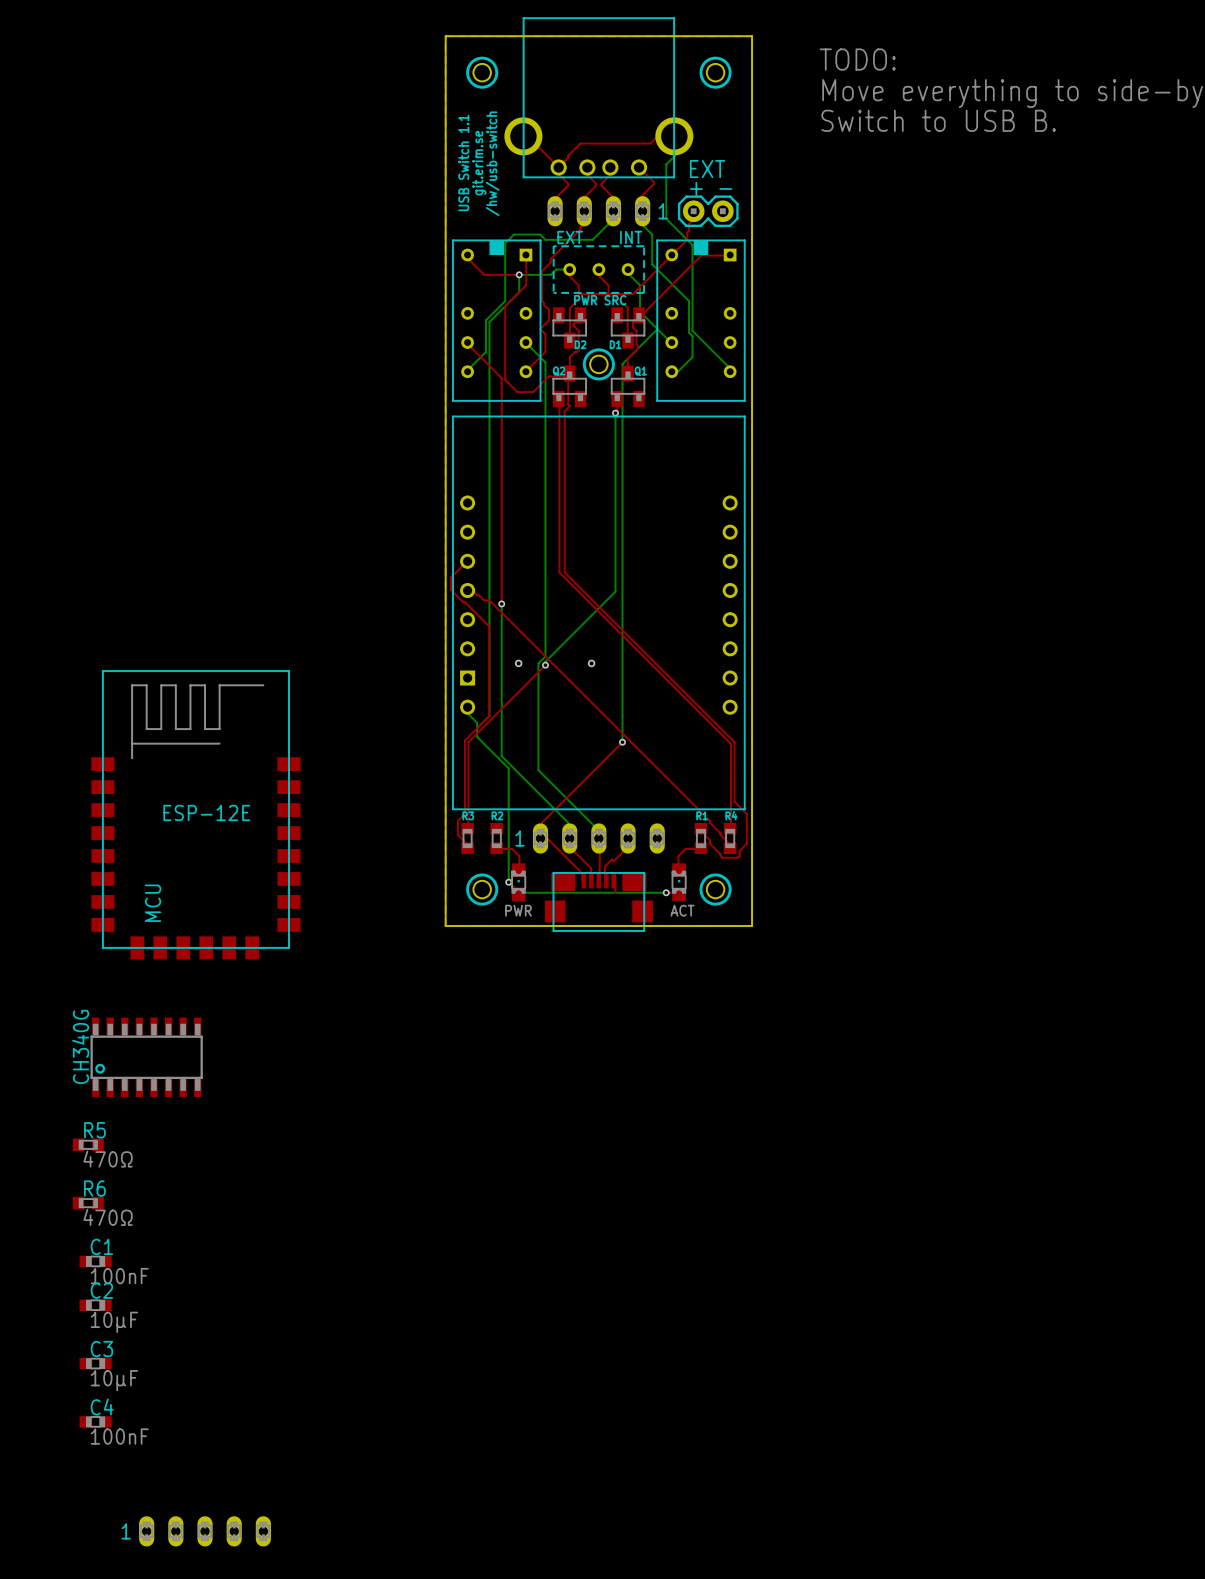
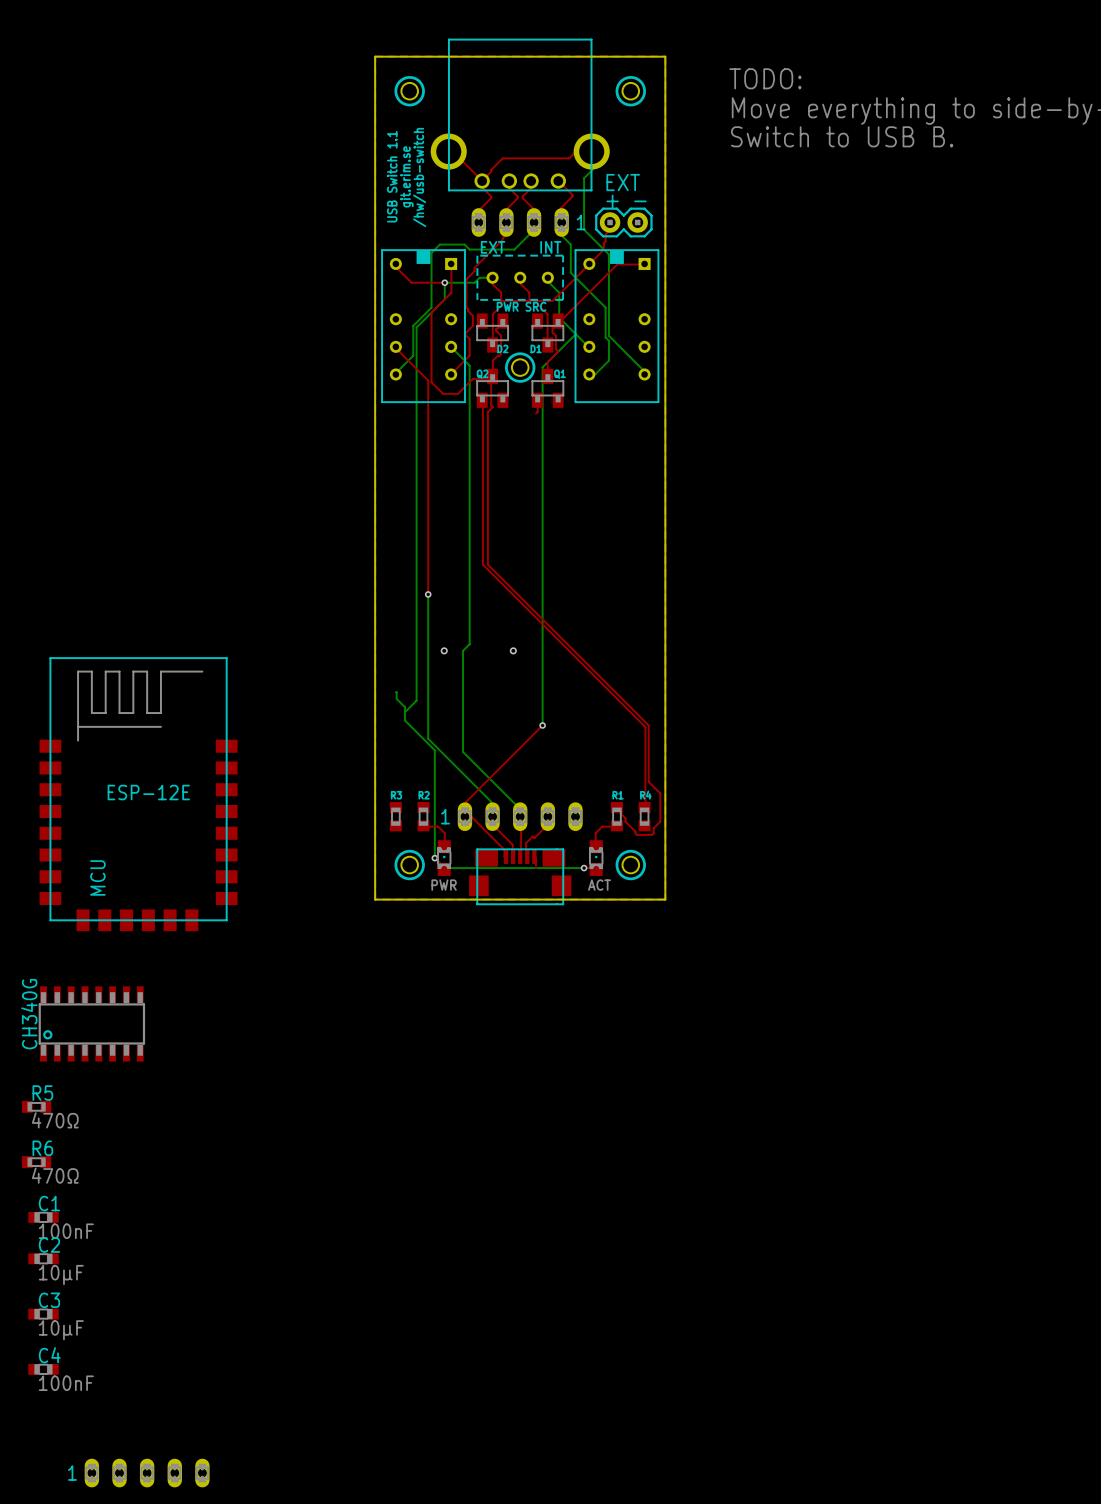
bottom track: (615, 413) (615, 591) (545, 661) (545, 665) -> none
via: (615, 413) -> none
top track: (467, 561) (450, 577) (450, 589) (489, 626) (489, 715) (464, 740) (464, 813) (457, 820) (457, 834) (466, 843) (467, 848) -> none
top track: (467, 590) (473, 591) (484, 600) (489, 600) (710, 820) (729, 843) (730, 848) -> none
part: (598, 612) -> none
top track: (545, 665) (468, 742) (467, 828) -> none
via: (545, 665) -> none

